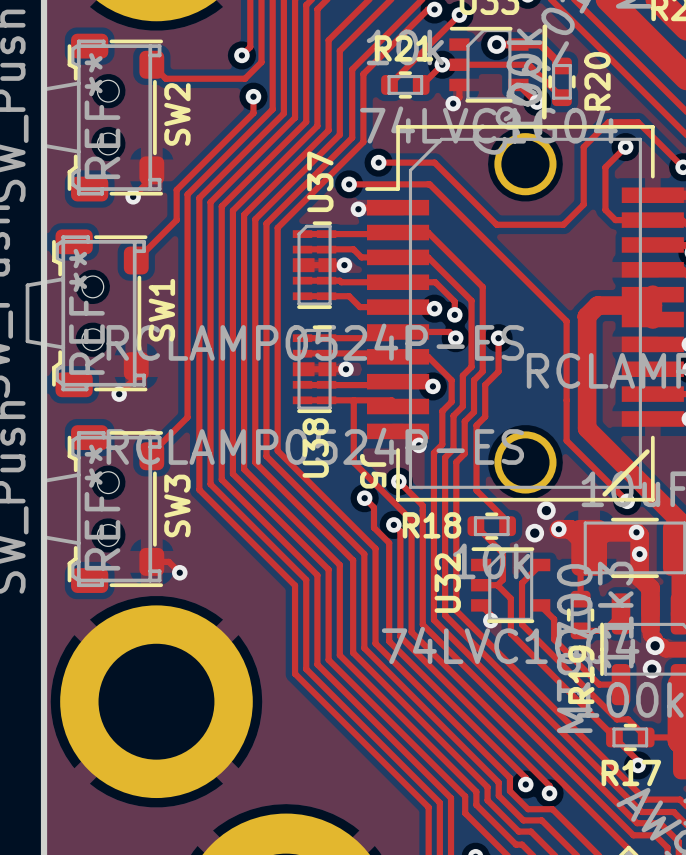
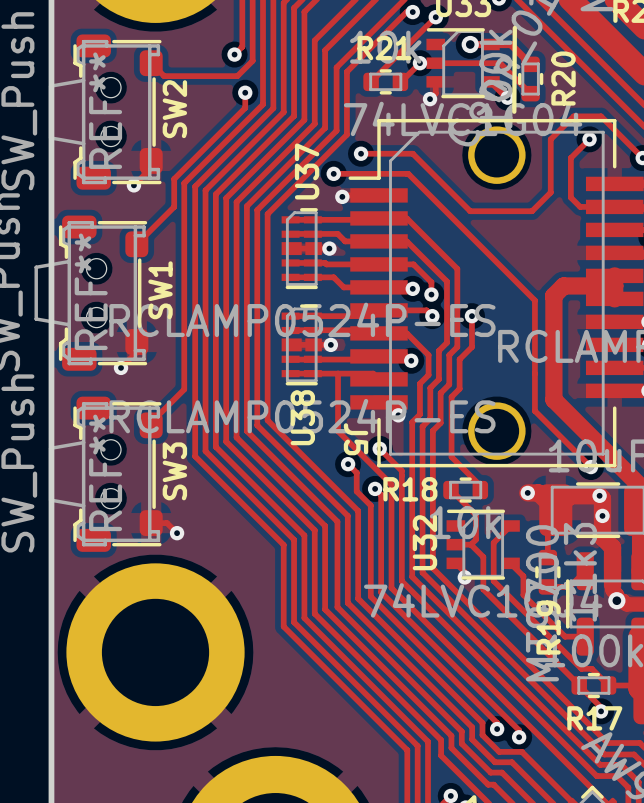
line: (647, 451) (604, 494) -> none
via: (546, 510) -> none
via: (534, 533) -> none
via: (652, 669) -> none

